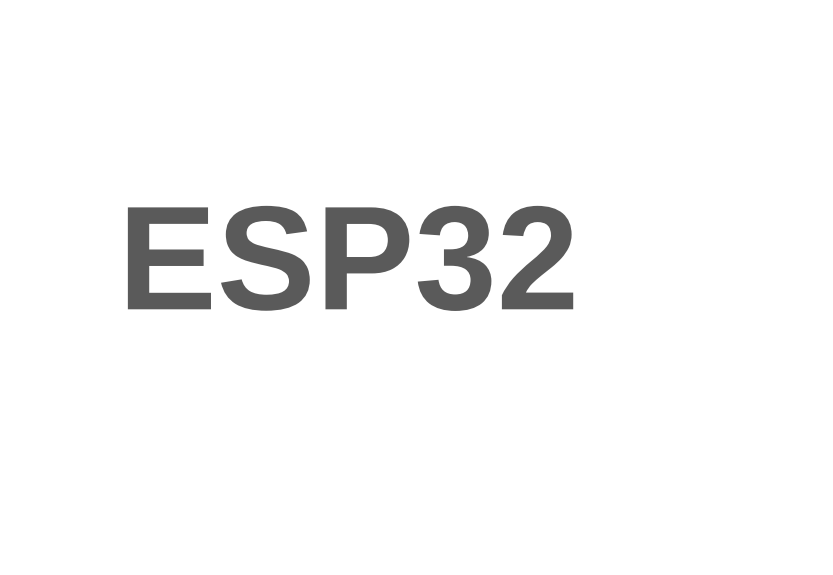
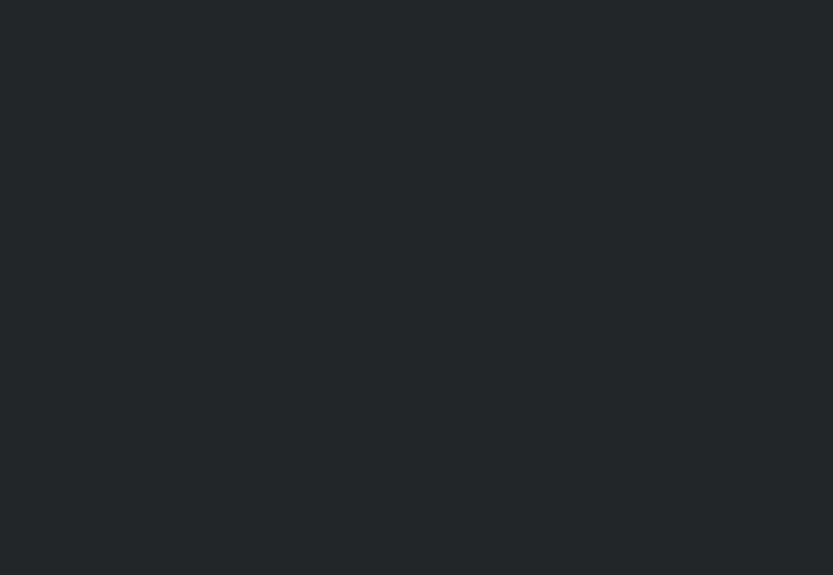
text: ESP32 (350, 258) -> none

